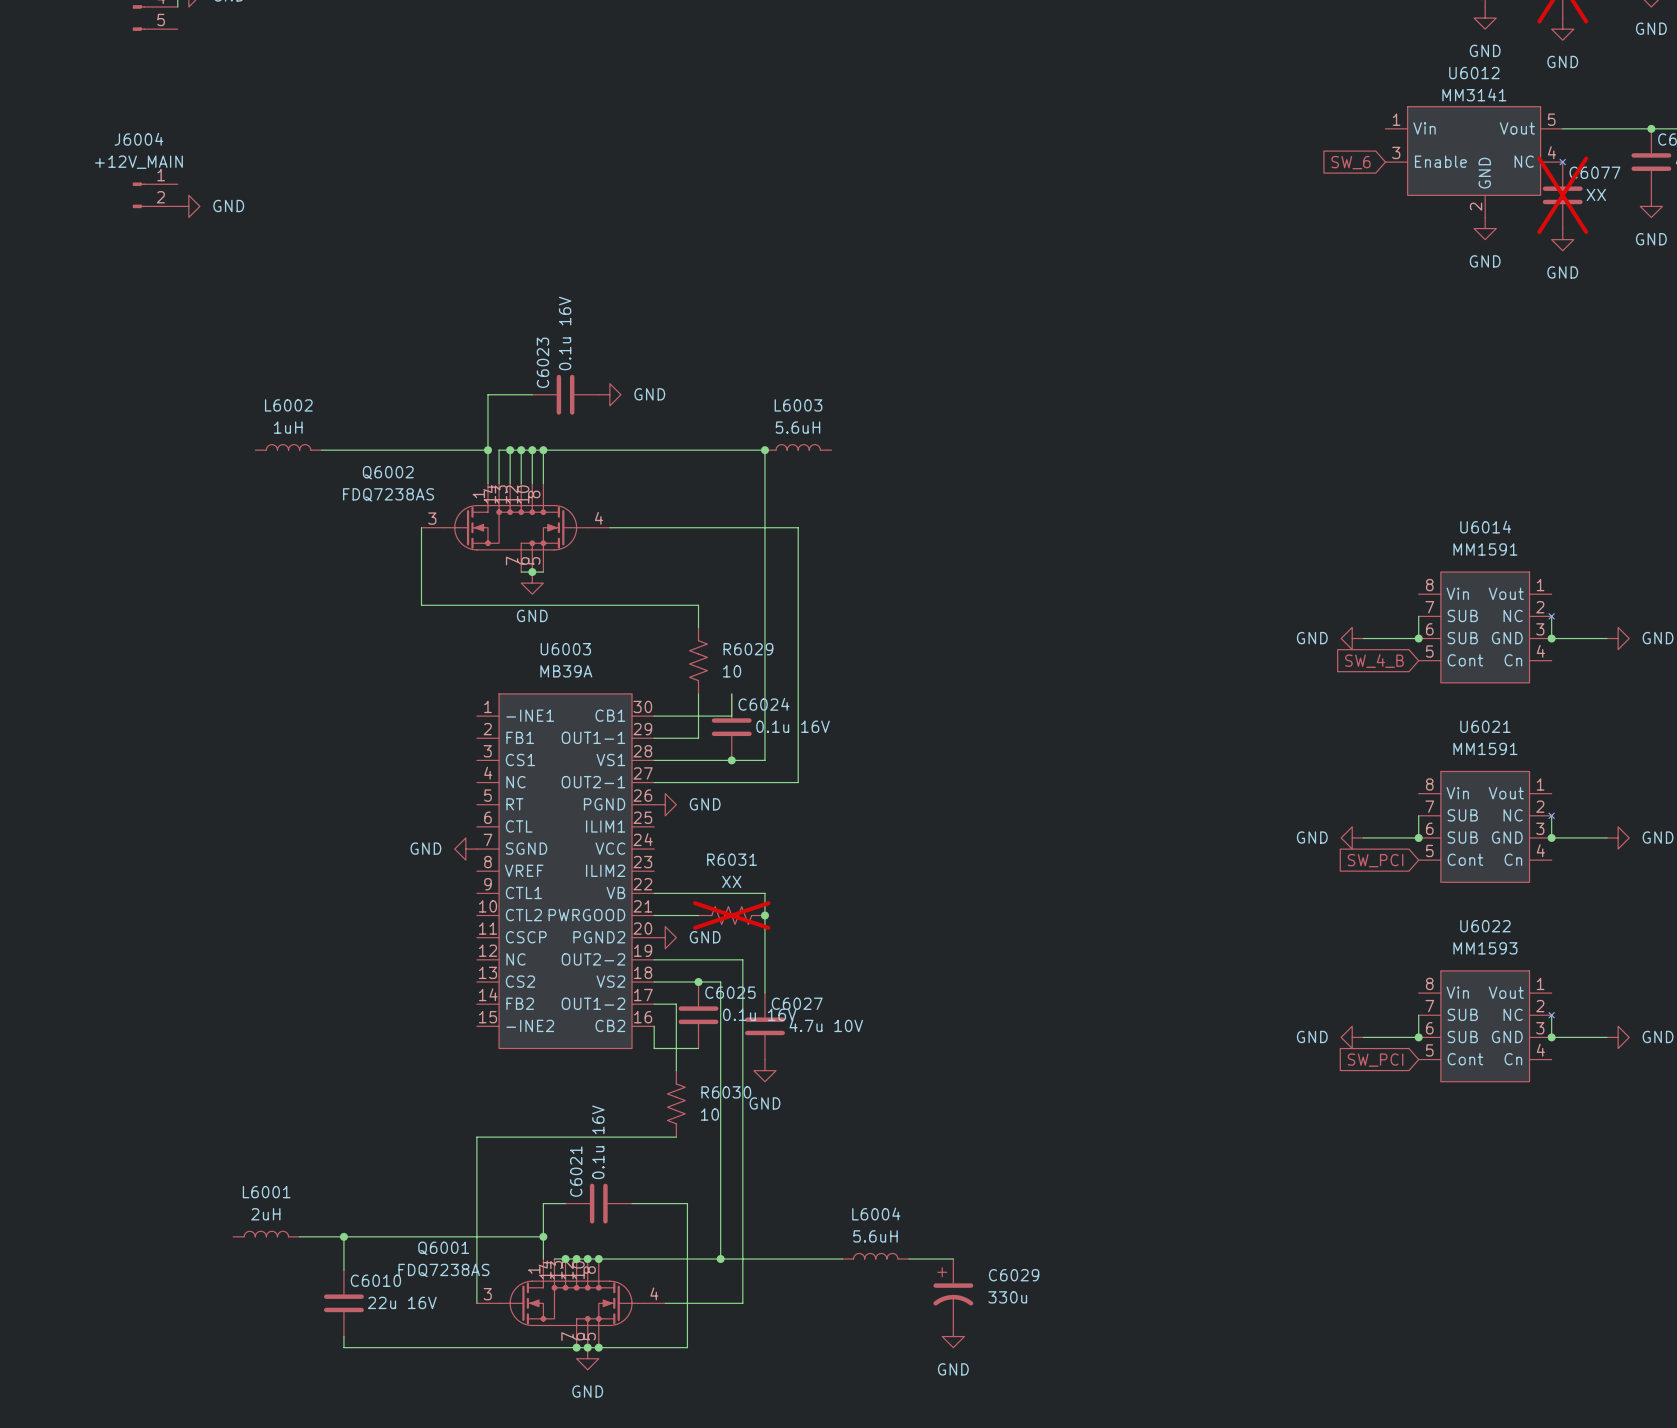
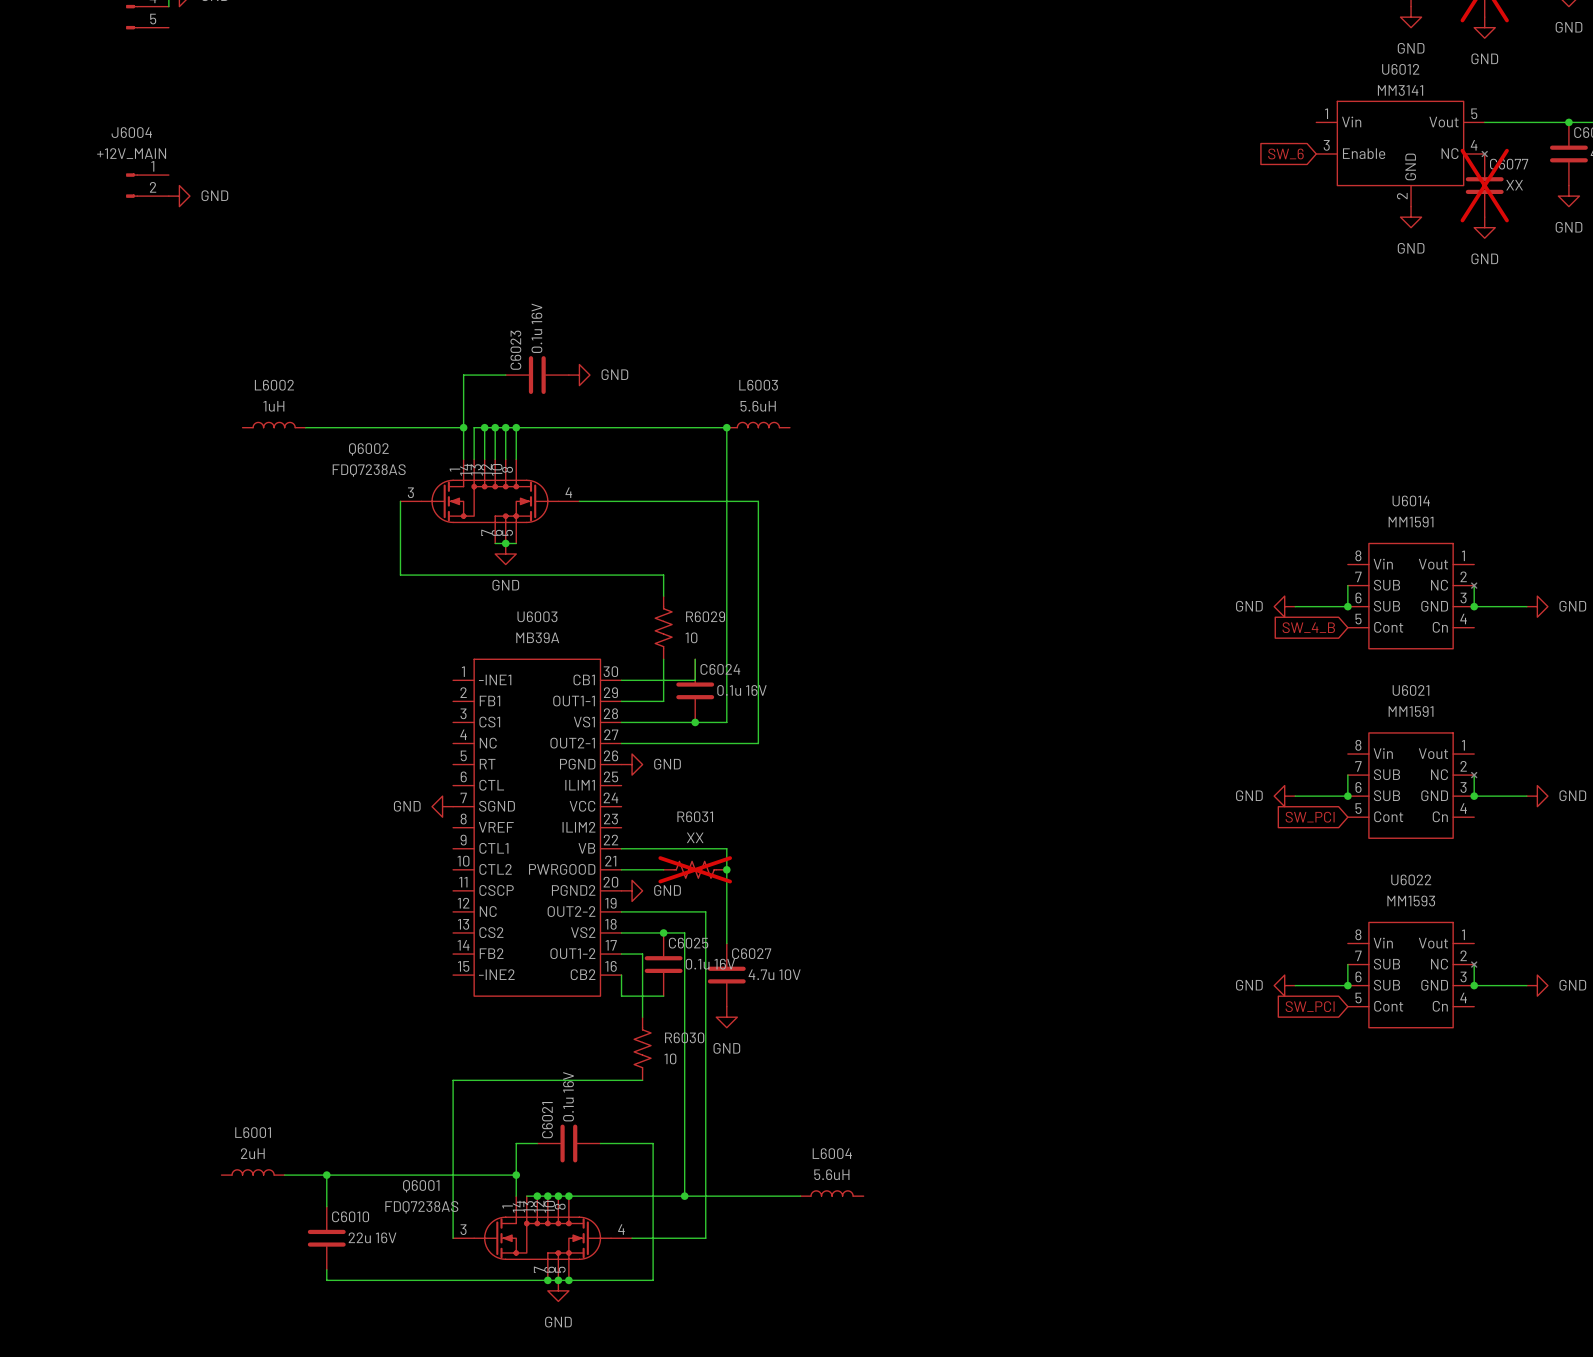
wire: (909, 1259) (953, 1259) -> none
C6029: 330u (953, 1292) -> none
power symbol: GND (953, 1336) -> none

